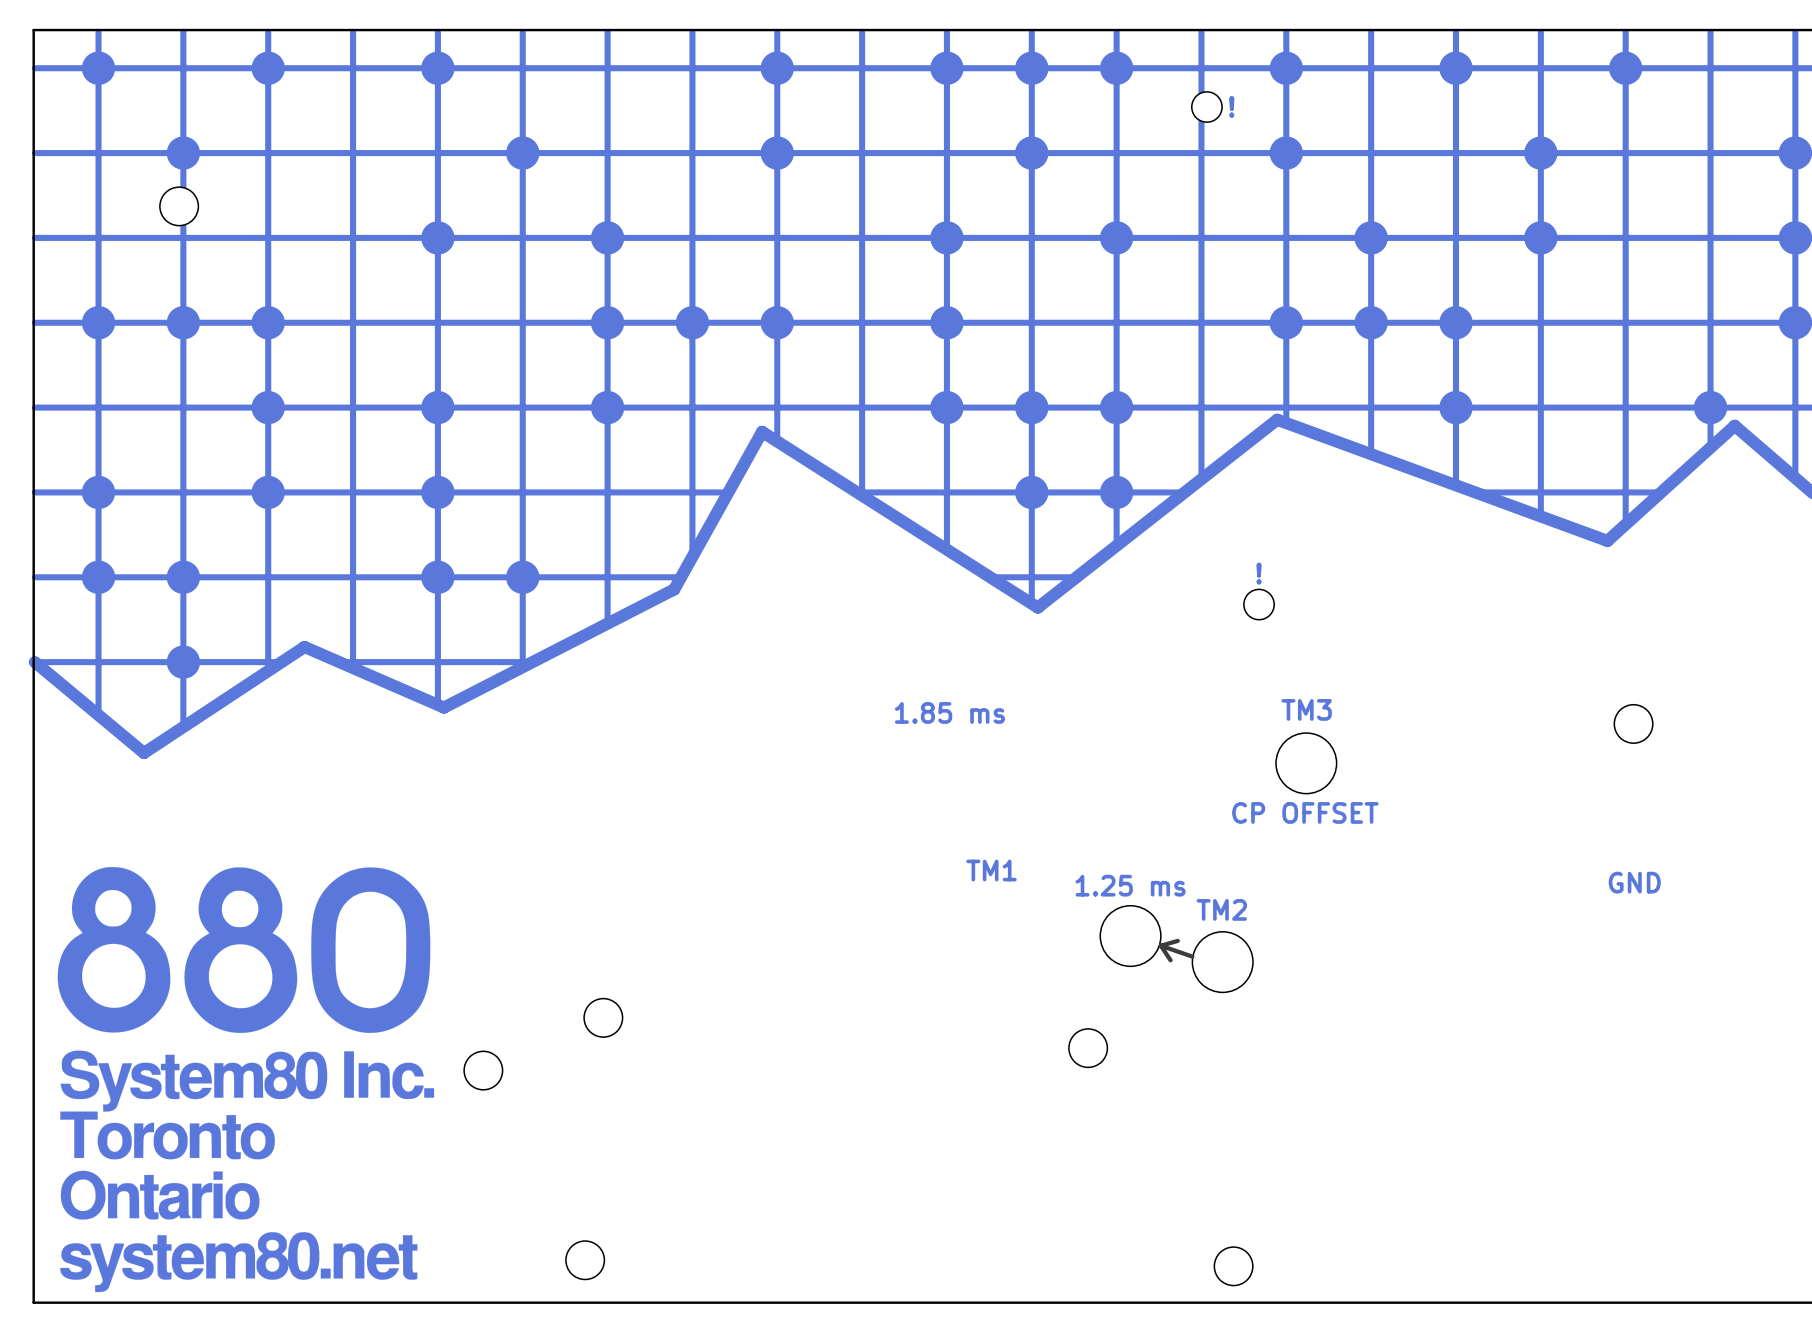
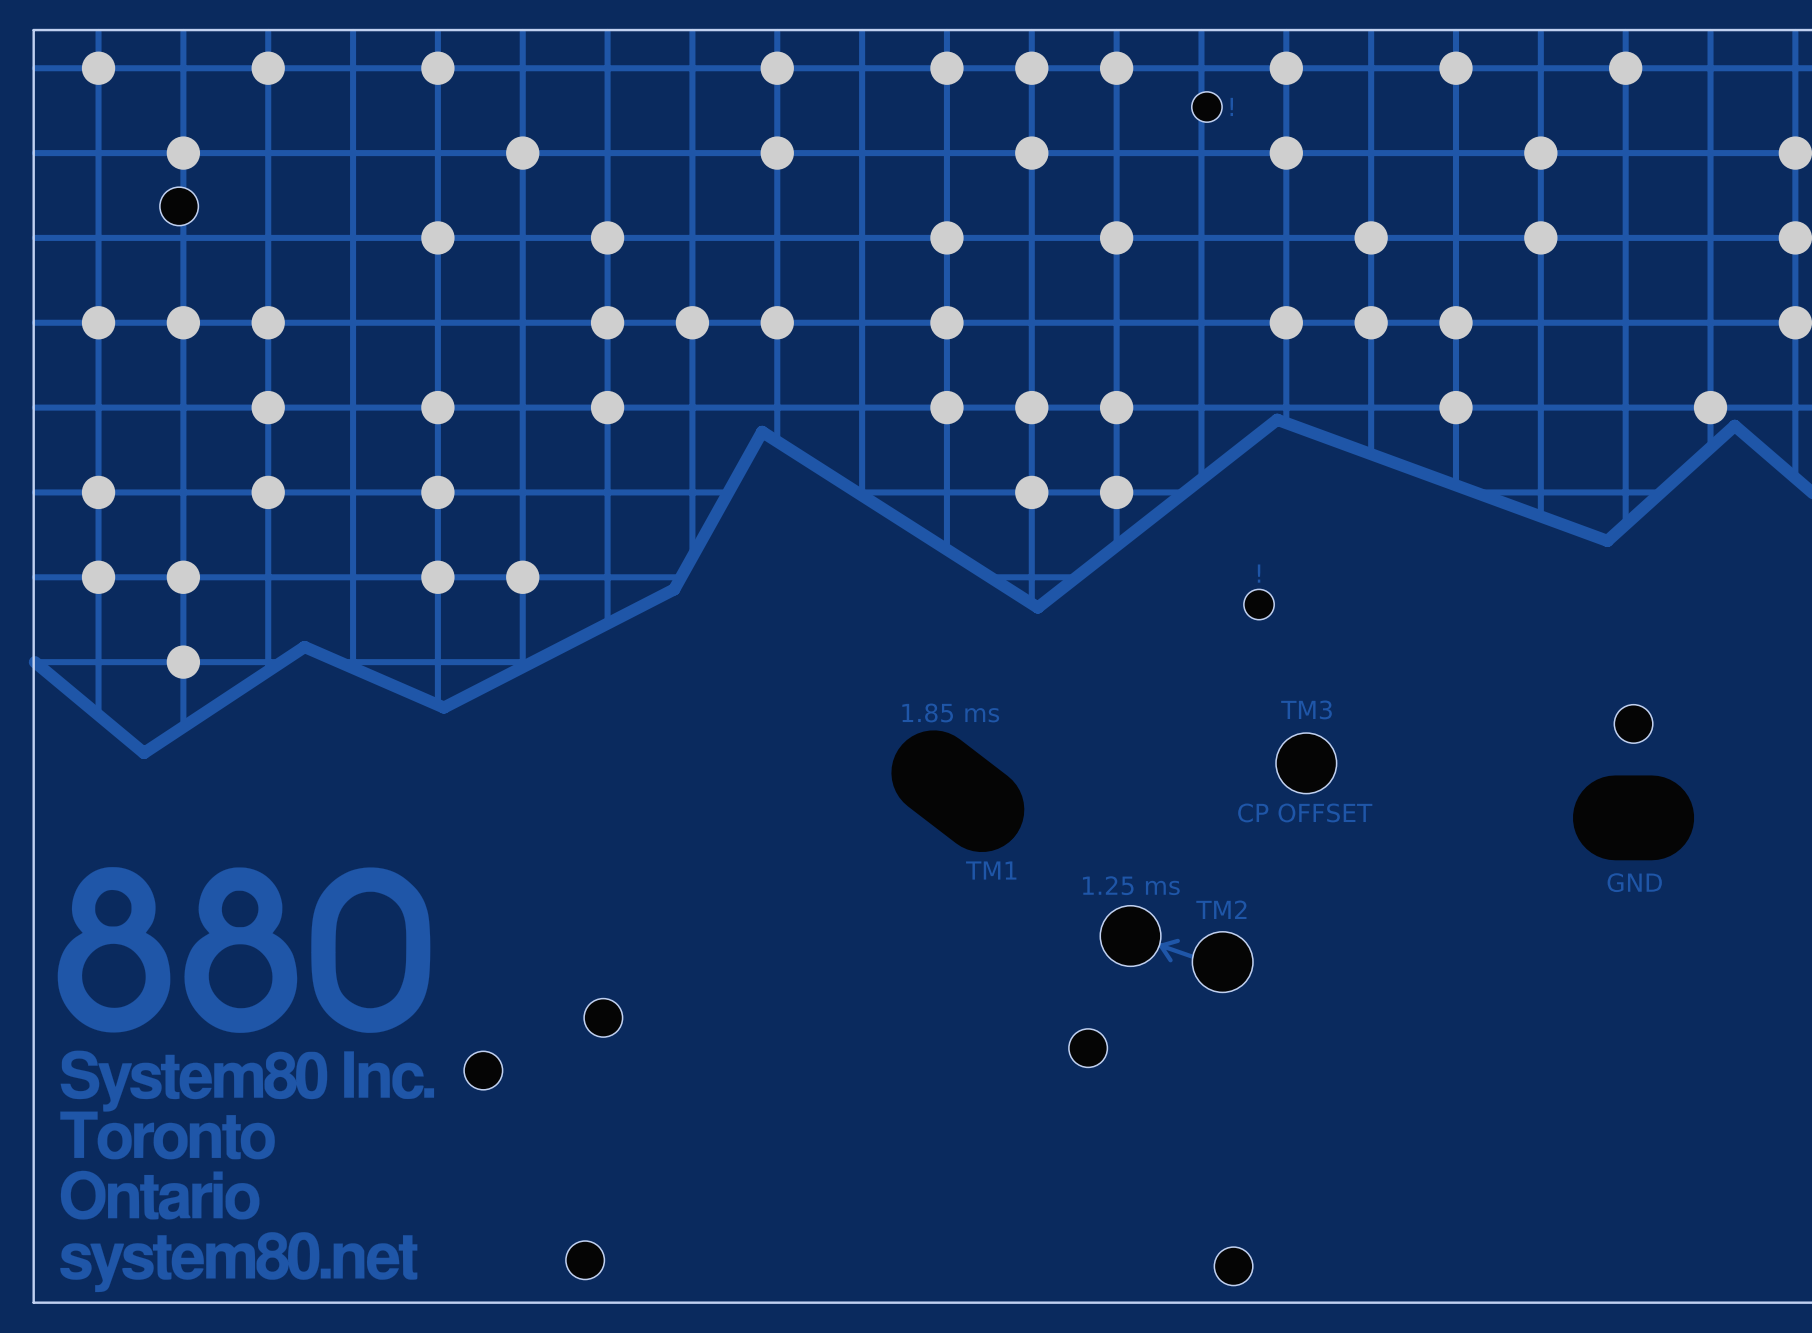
line: (1177, 940) (1160, 945) -> none
track: none -> (1177, 940) (1160, 945)
line: (1160, 945) (1170, 960) -> none
line: (1160, 945) (1192, 956) -> none
track: none -> (1160, 945) (1170, 960)
track: none -> (1160, 945) (1192, 956)

